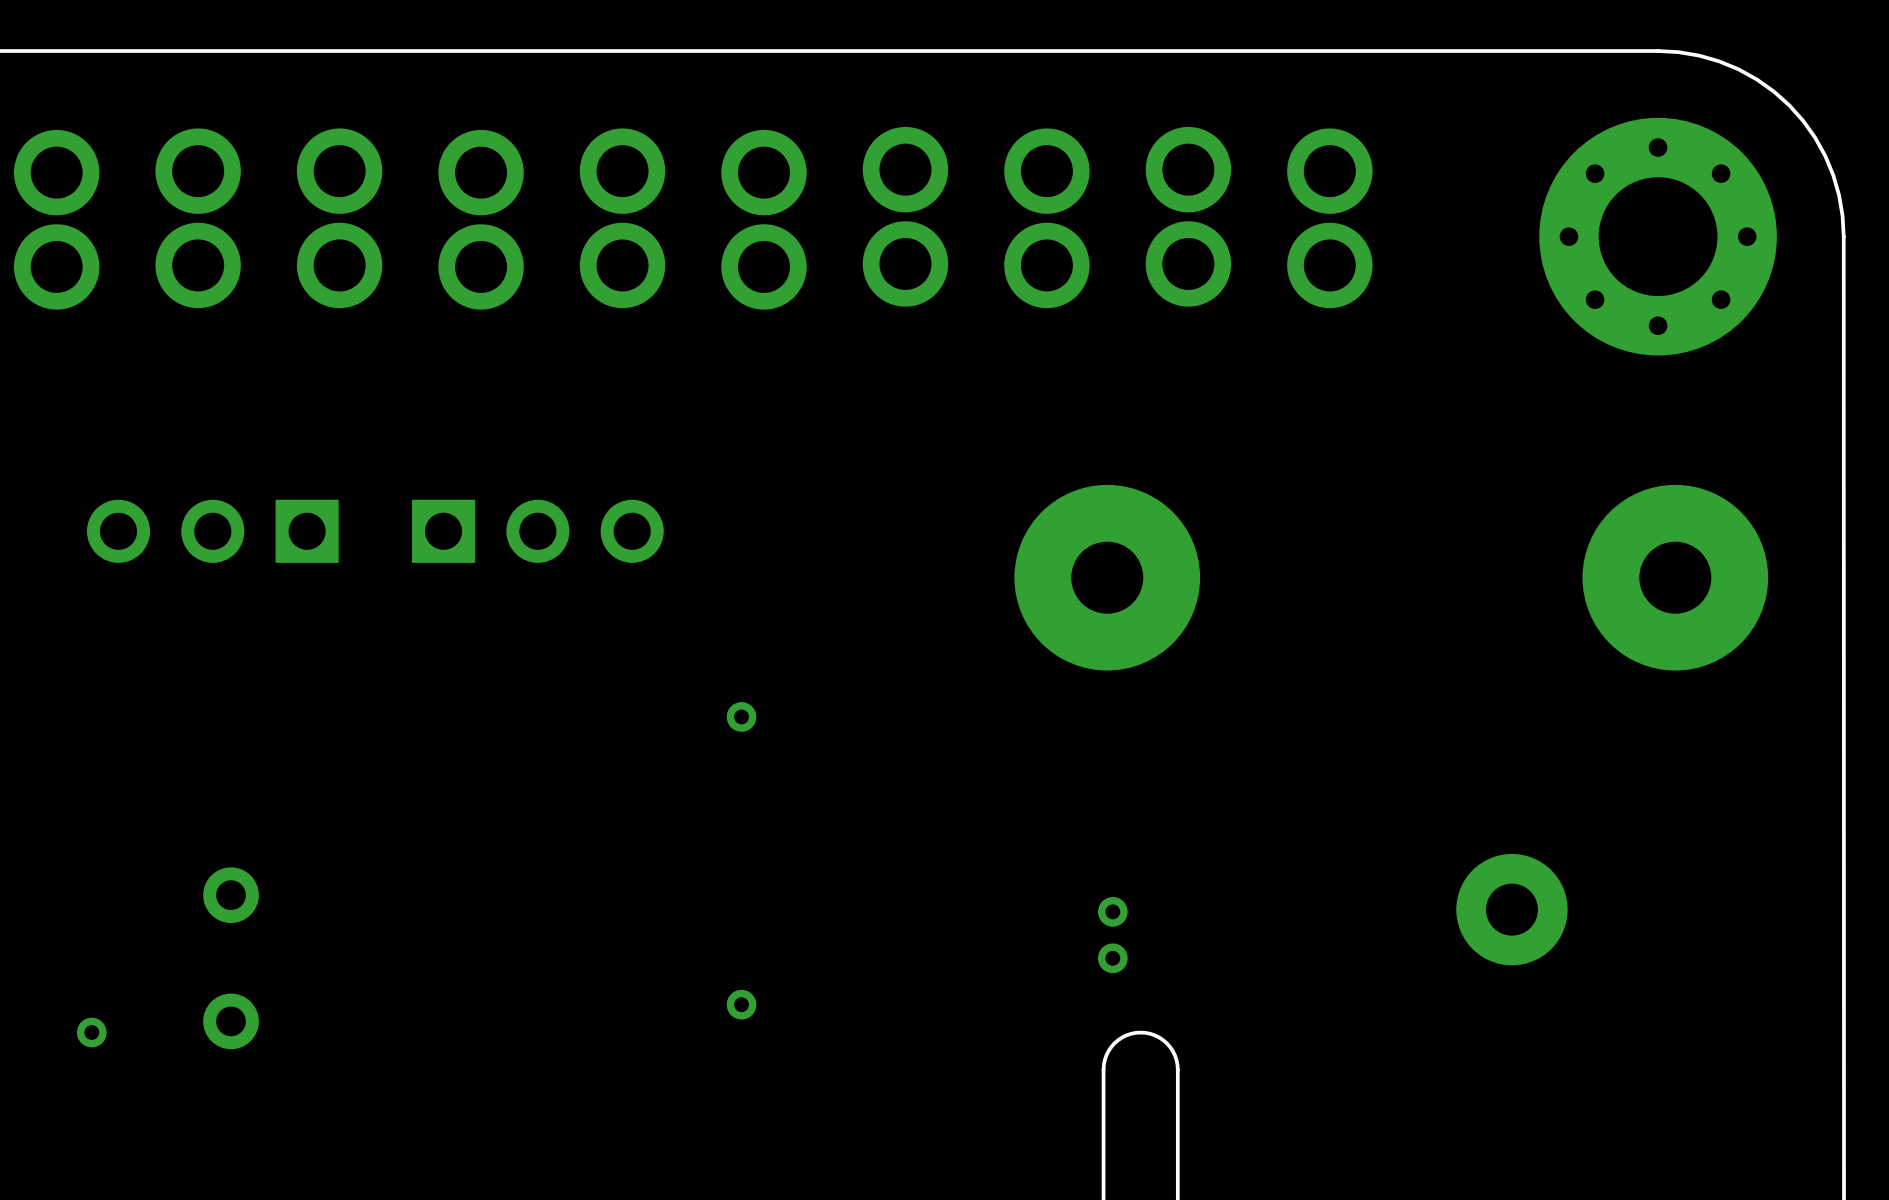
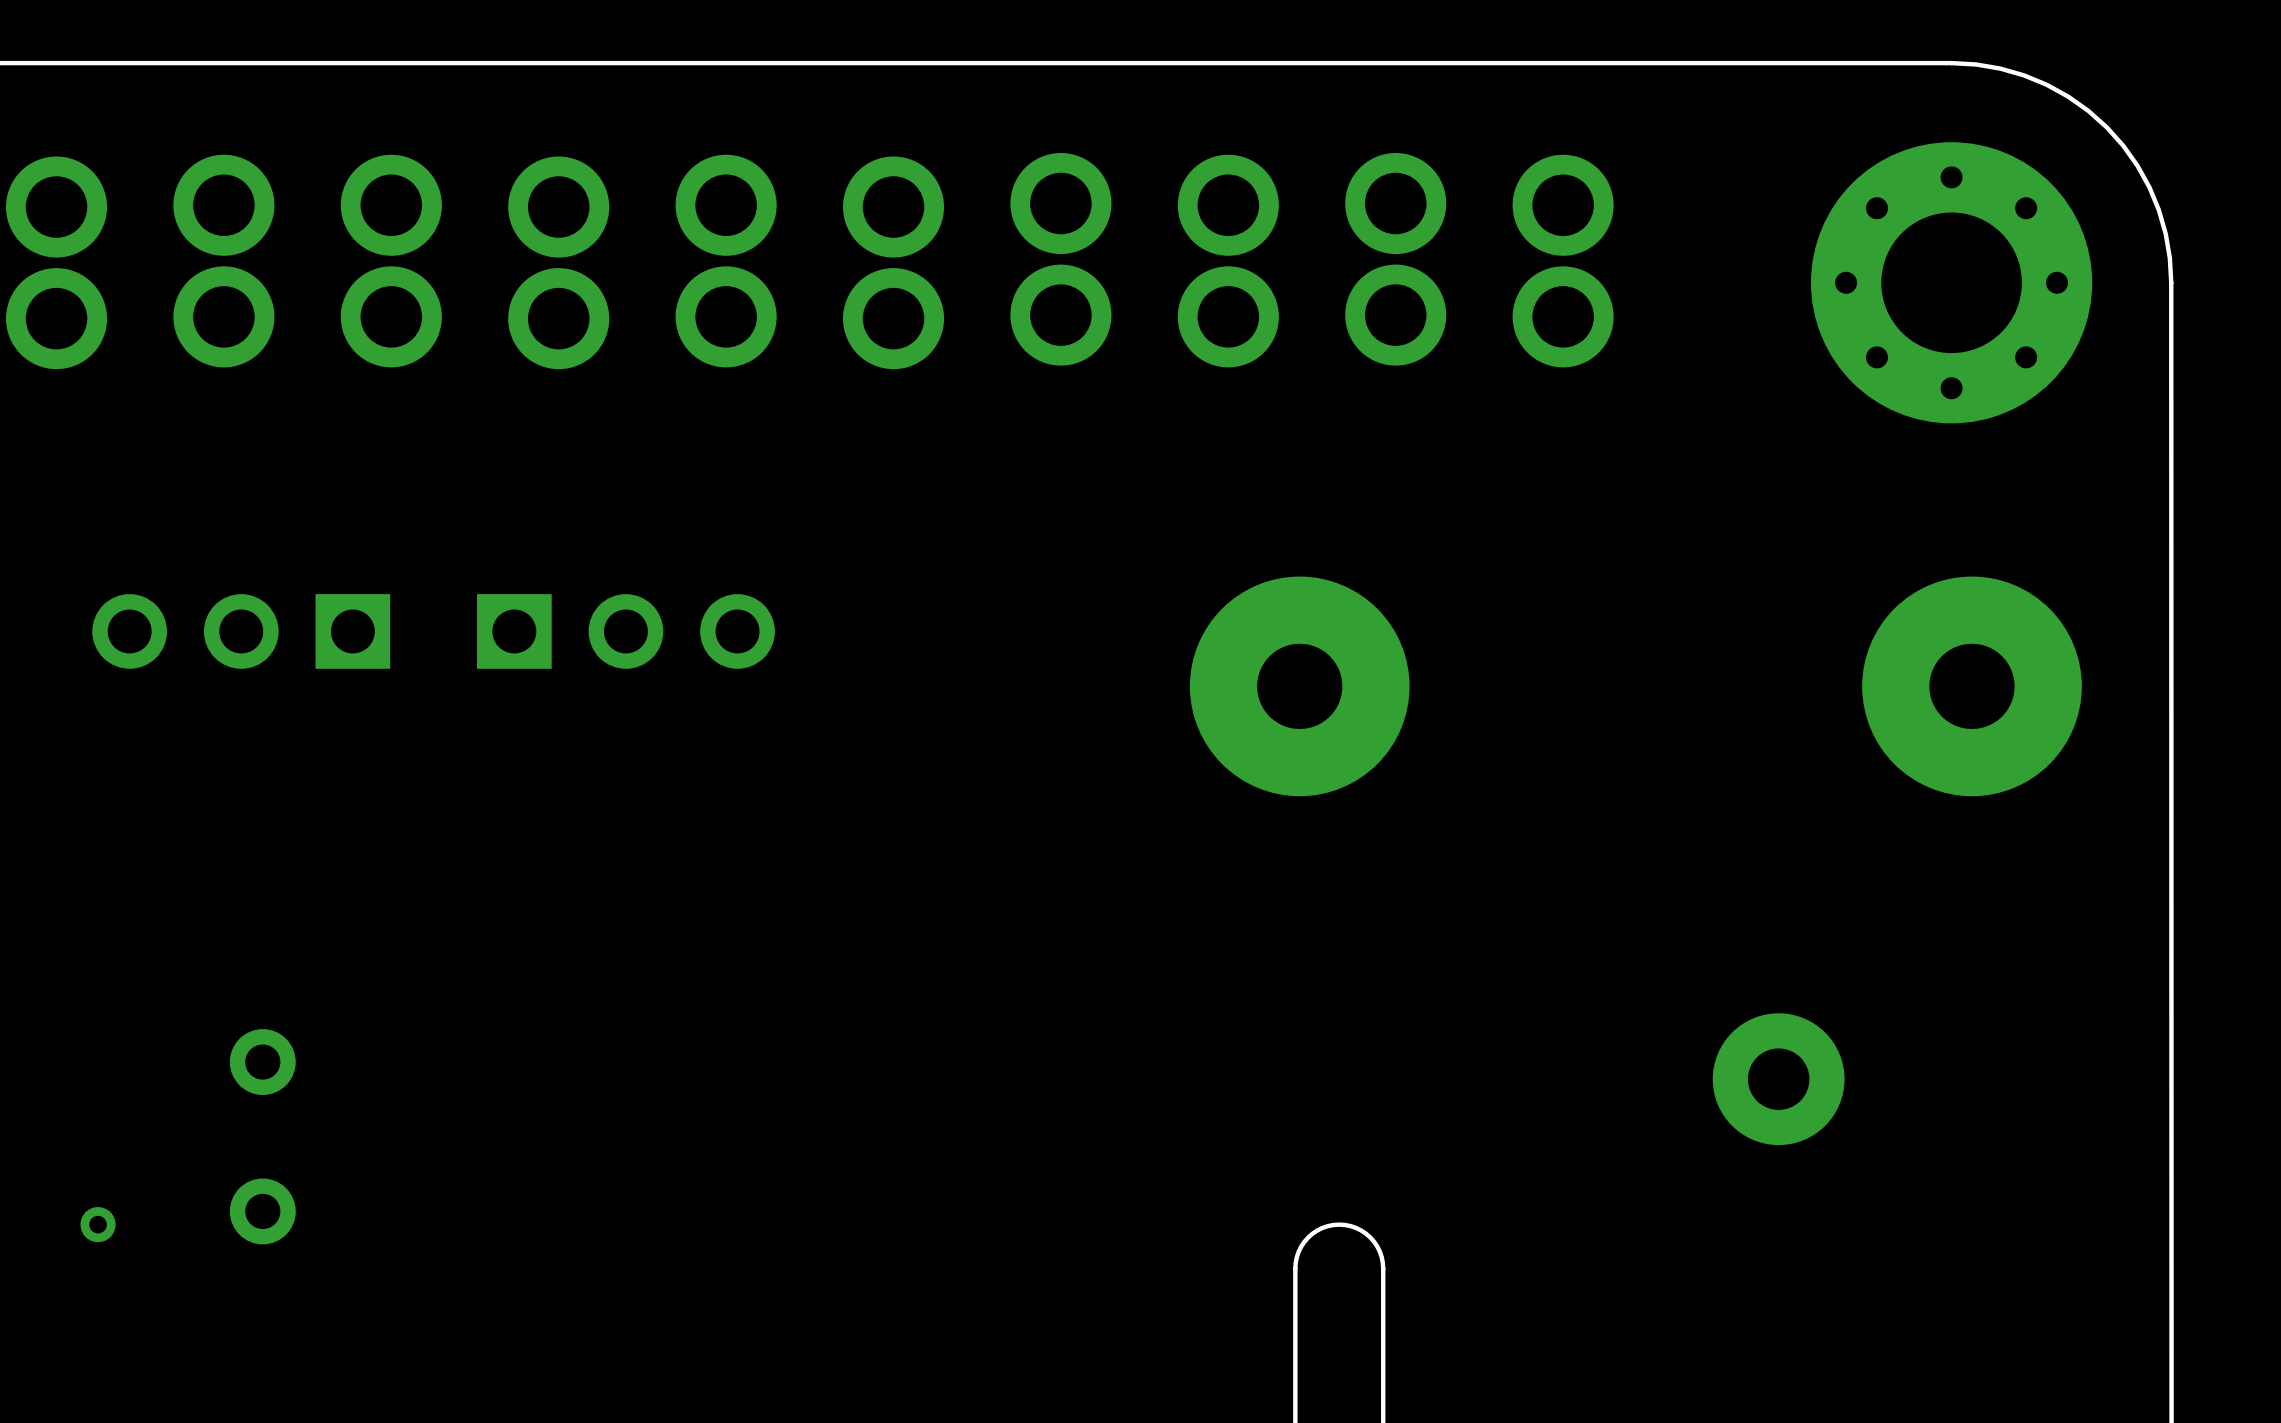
via: (741, 716) -> none
via: (1112, 911) -> none
via: (1112, 958) -> none
via: (741, 1004) -> none

